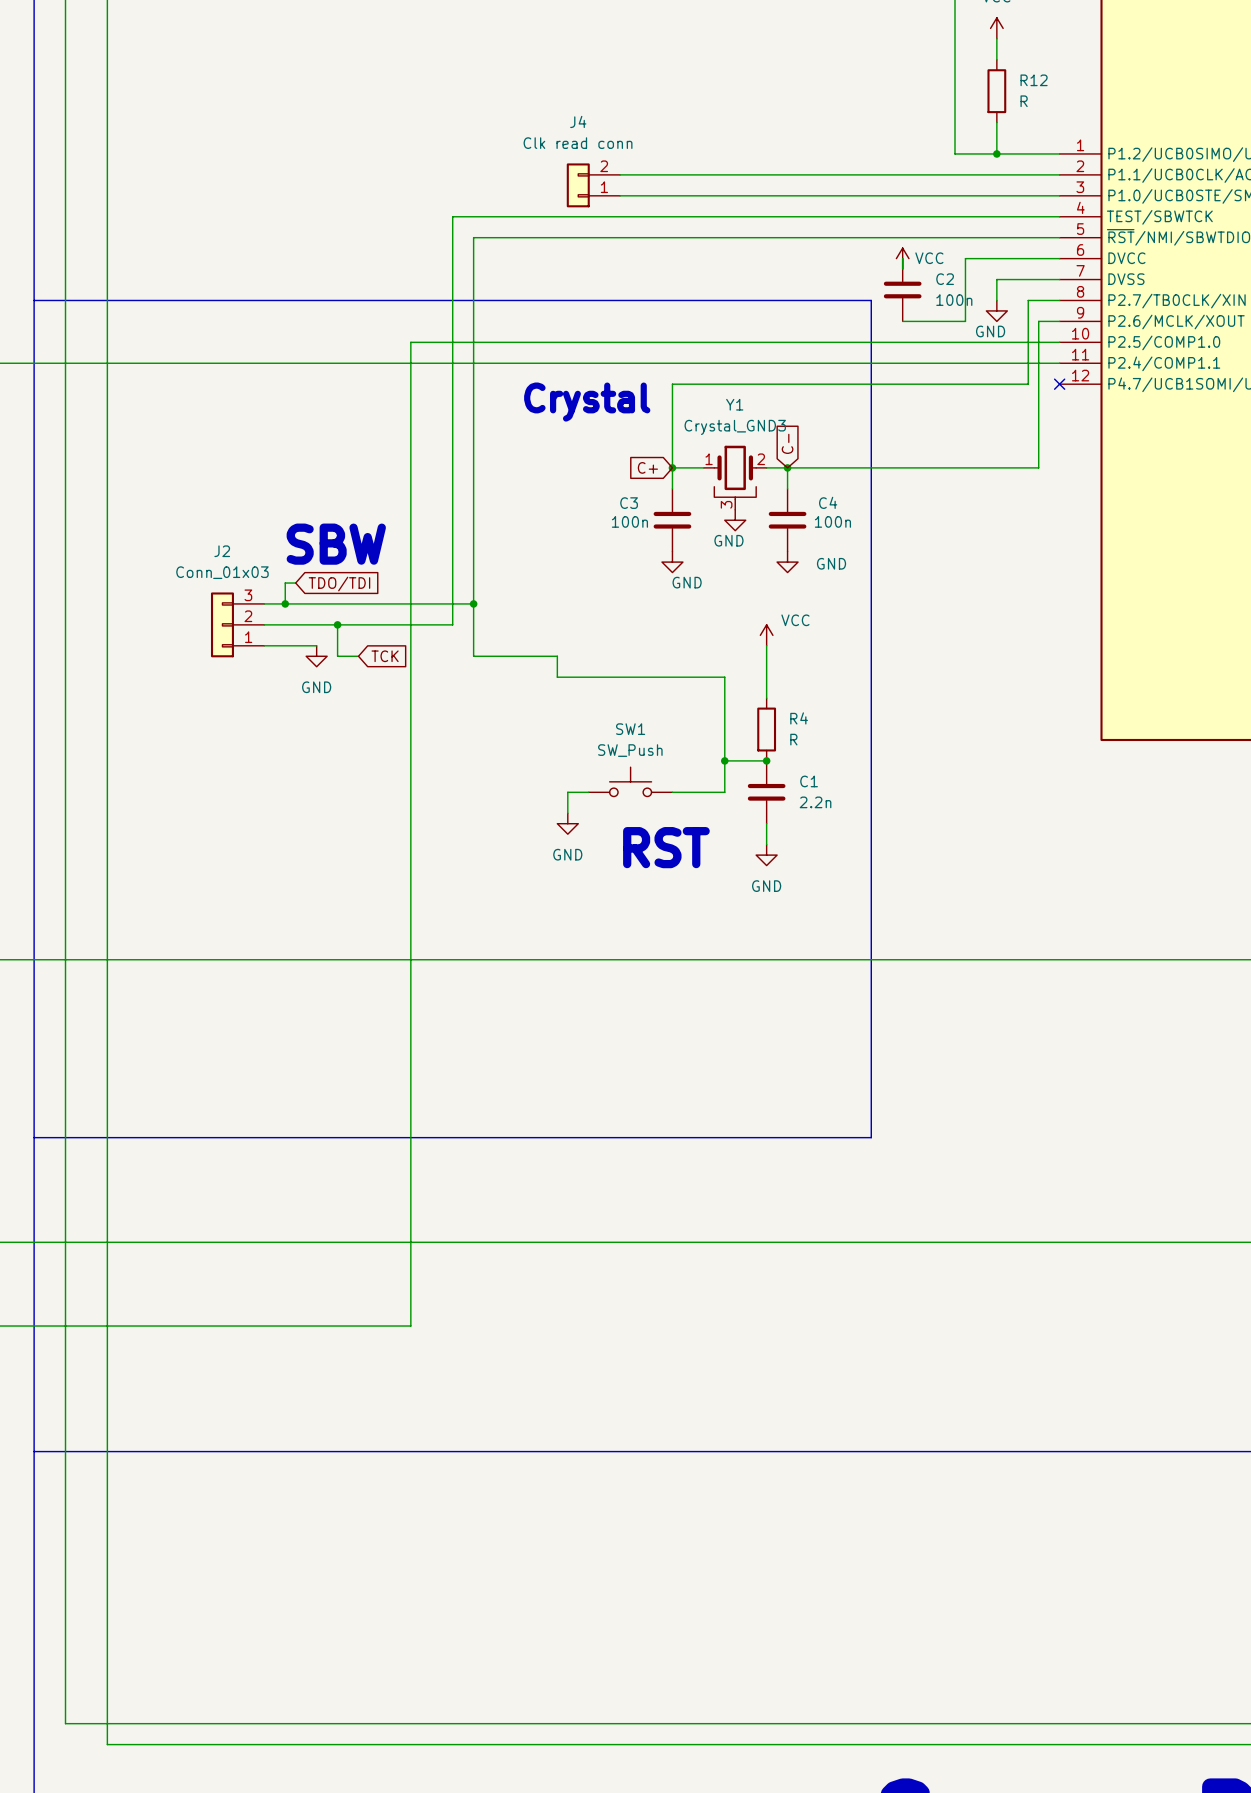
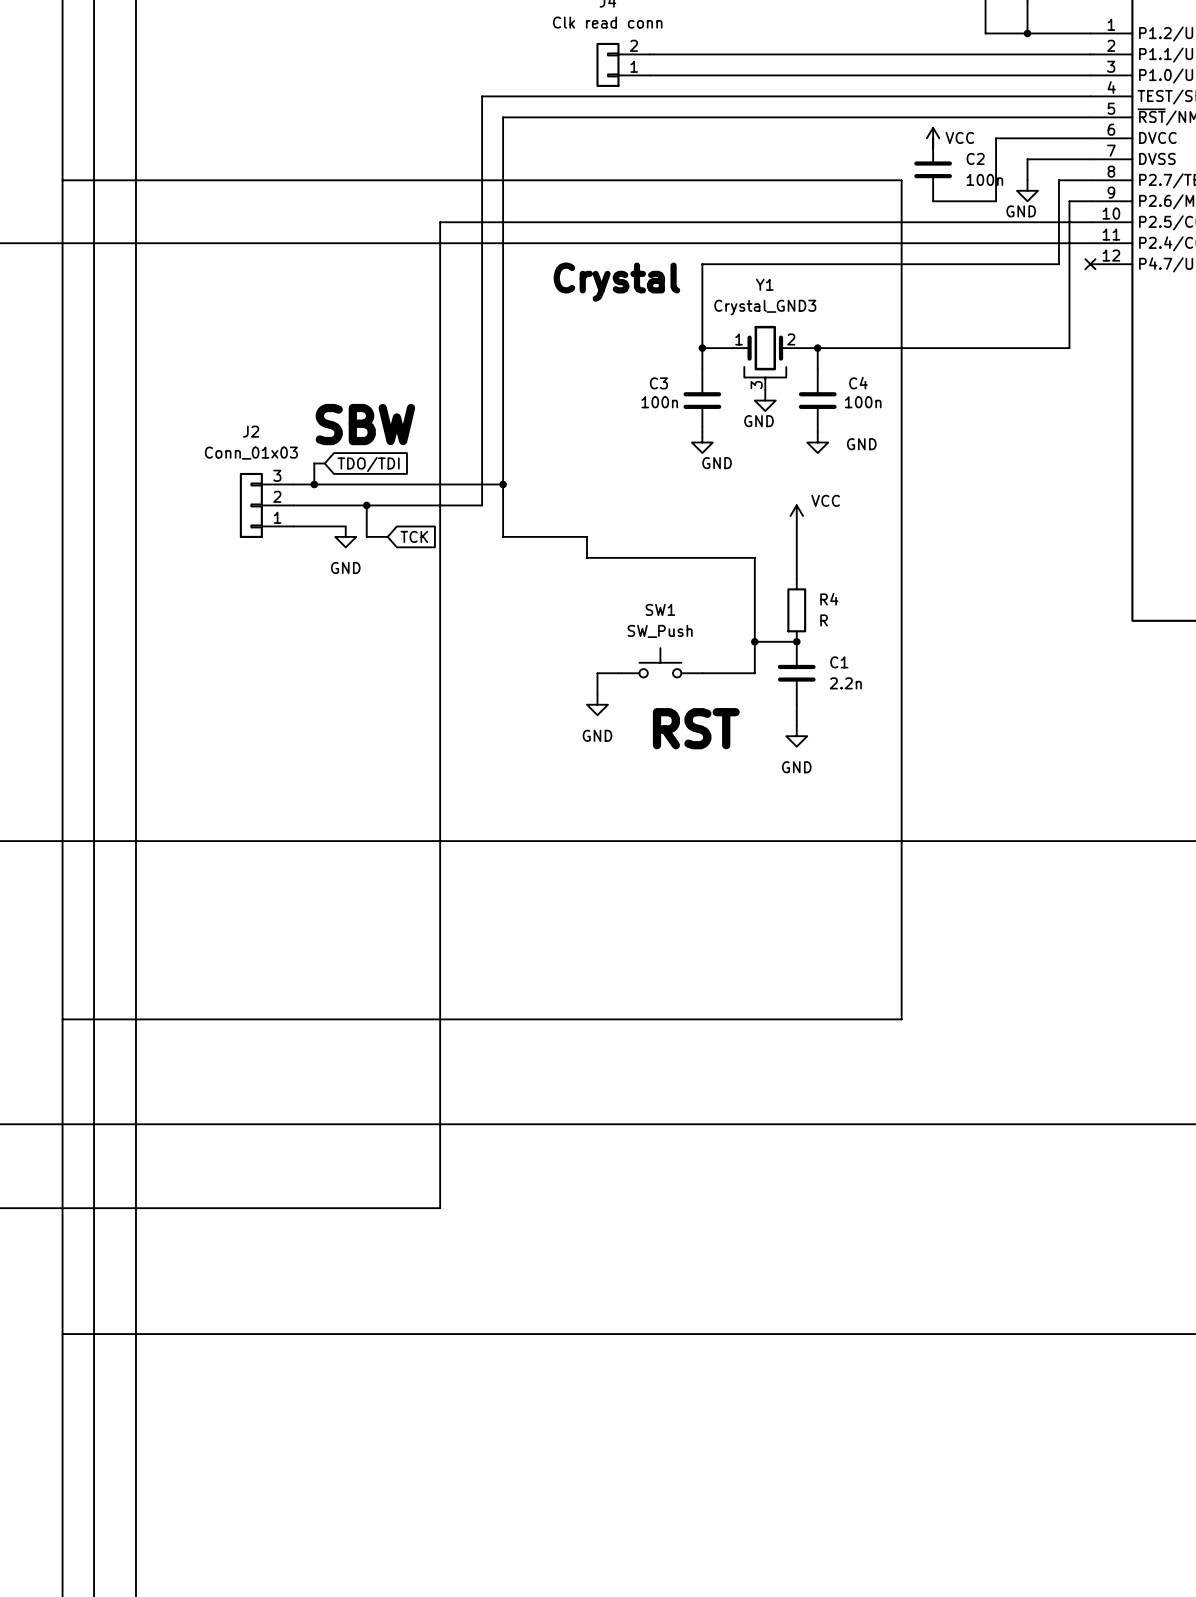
global label: C- (787, 443) -> none
global label: C+ (647, 467) -> none

